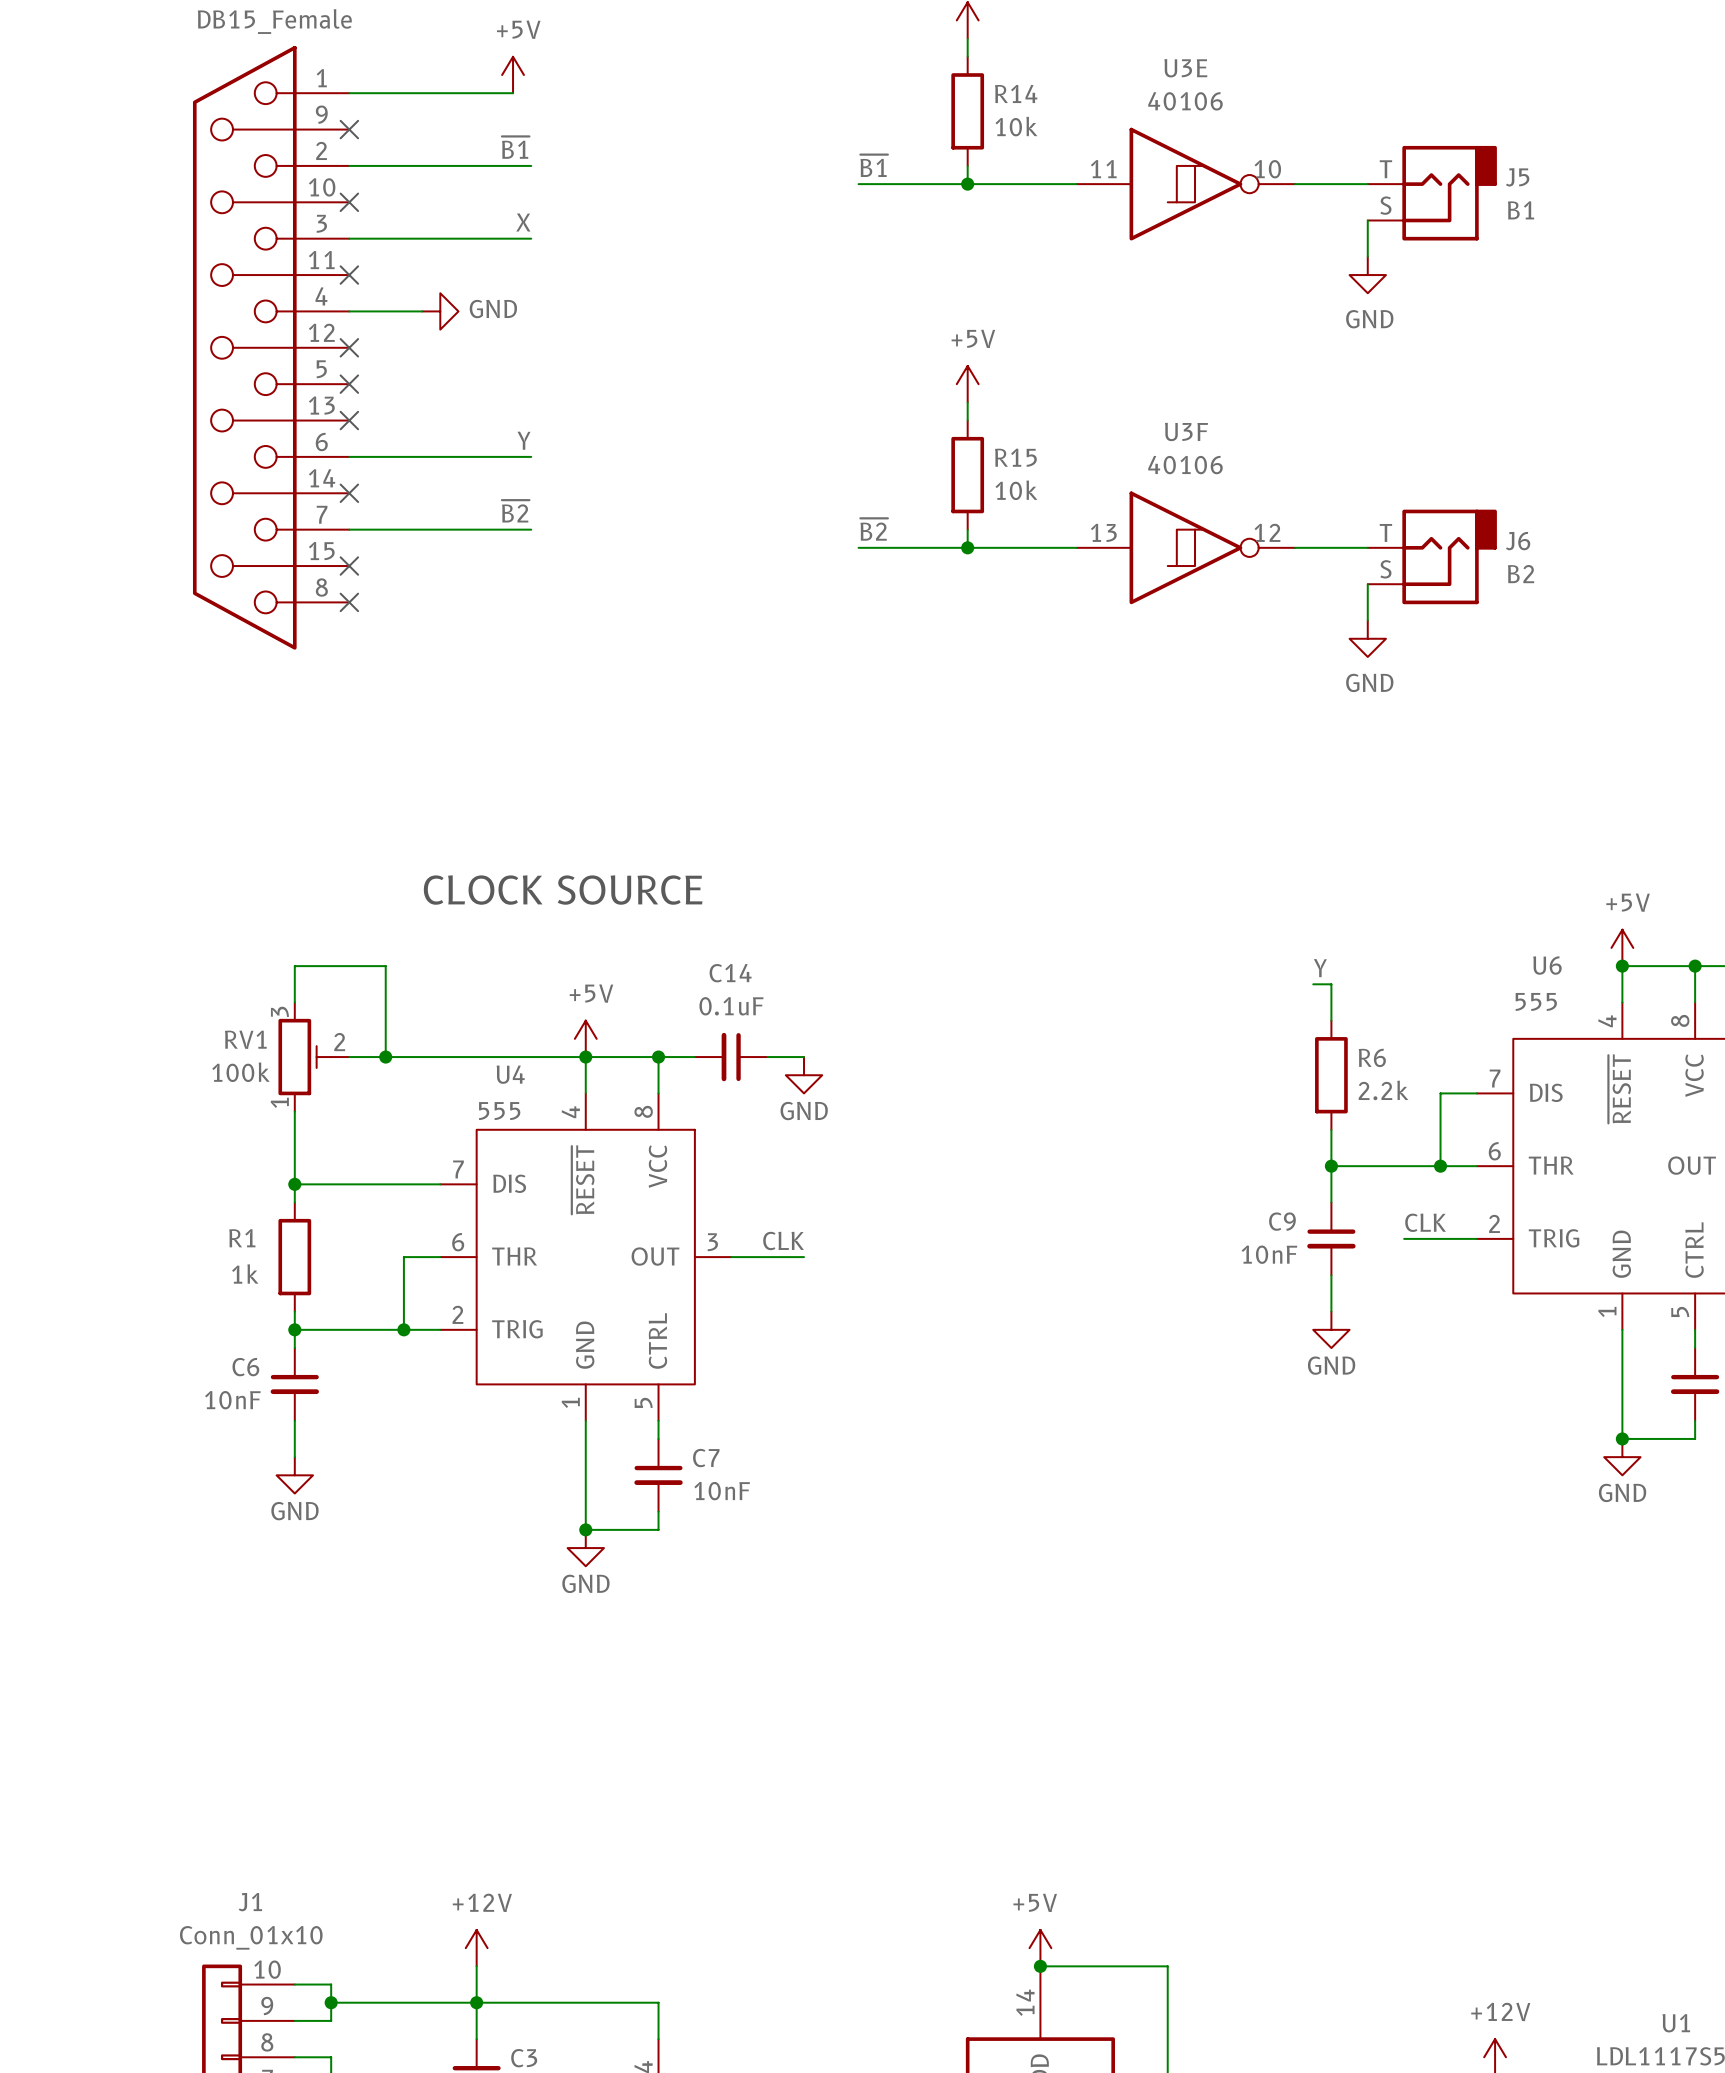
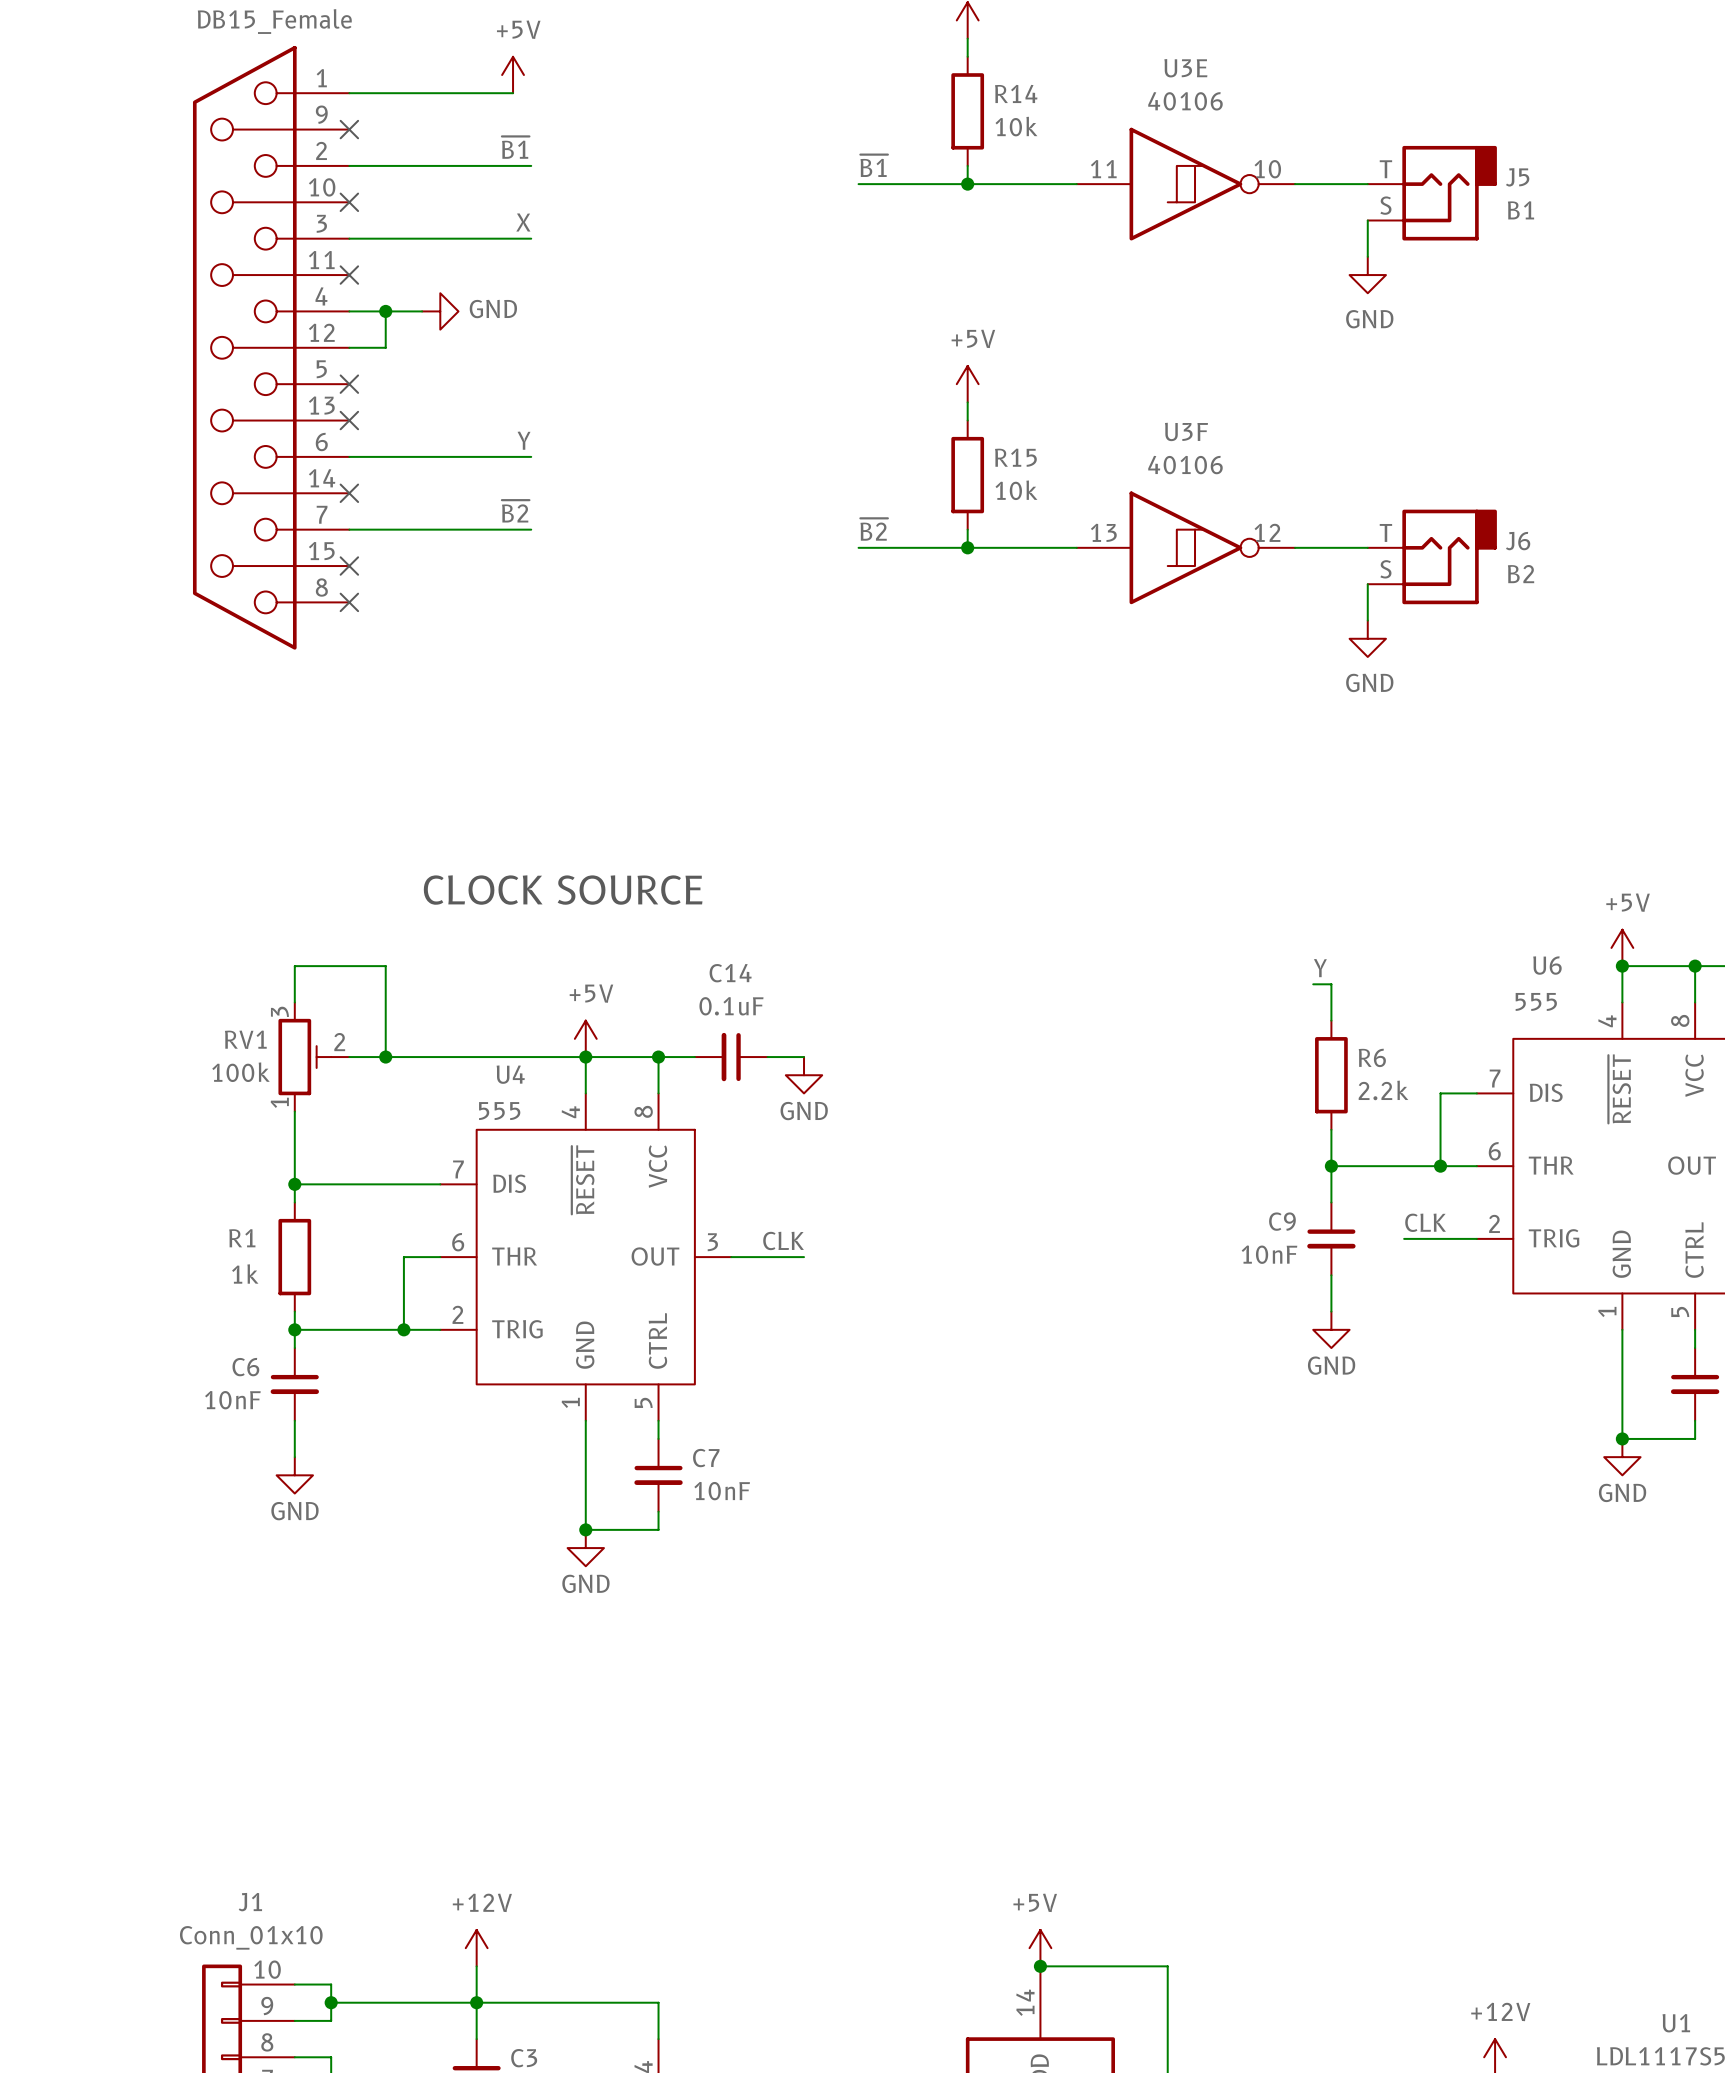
wire: none -> (385, 311) (385, 347) (349, 347)
junction: none -> (385, 311)
no-connect mark: (349, 347) -> none

